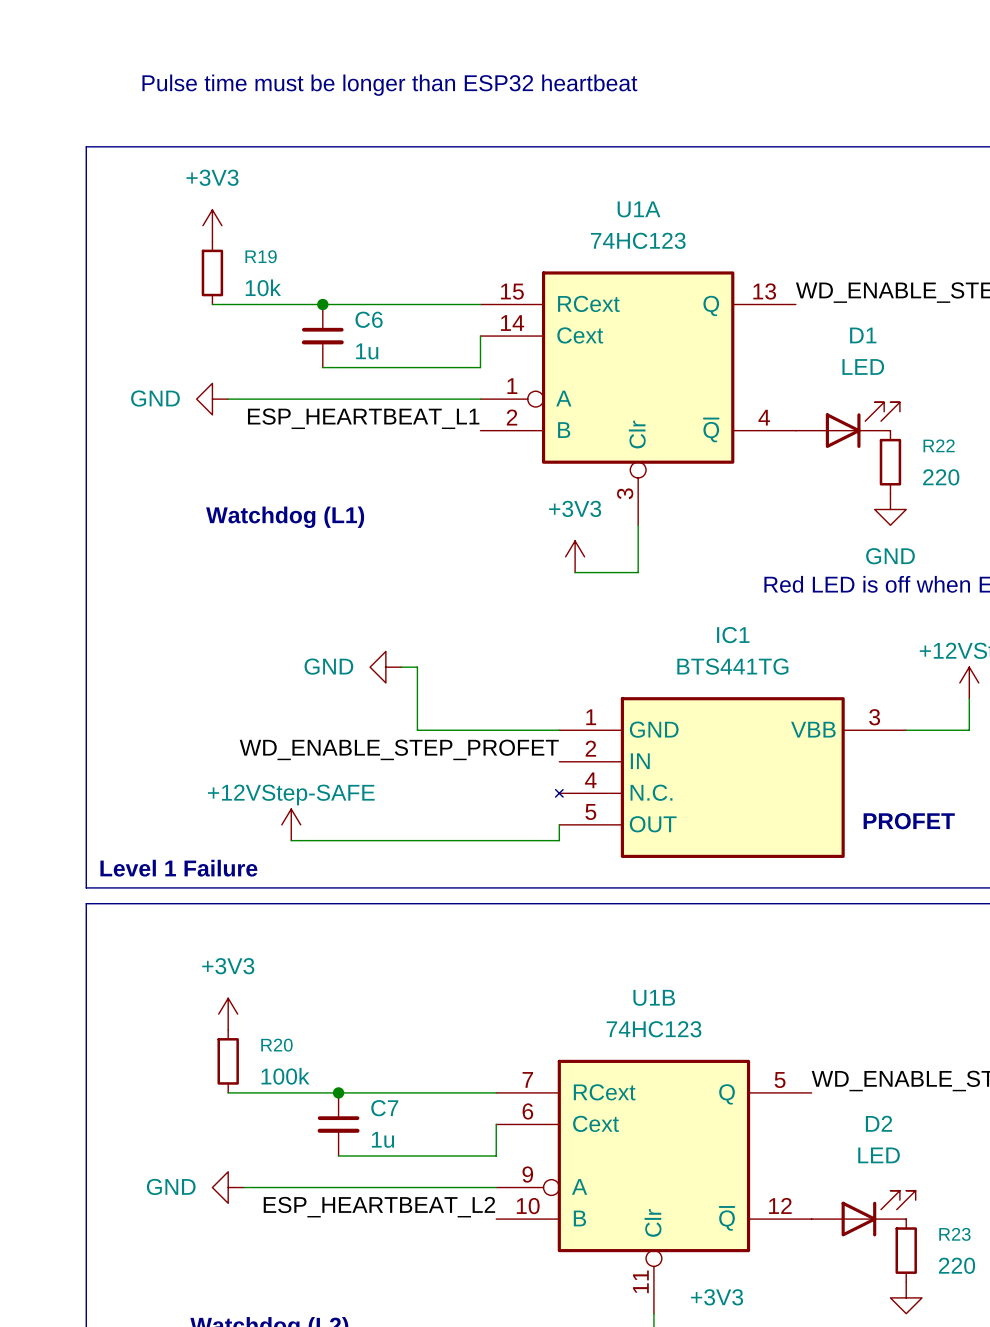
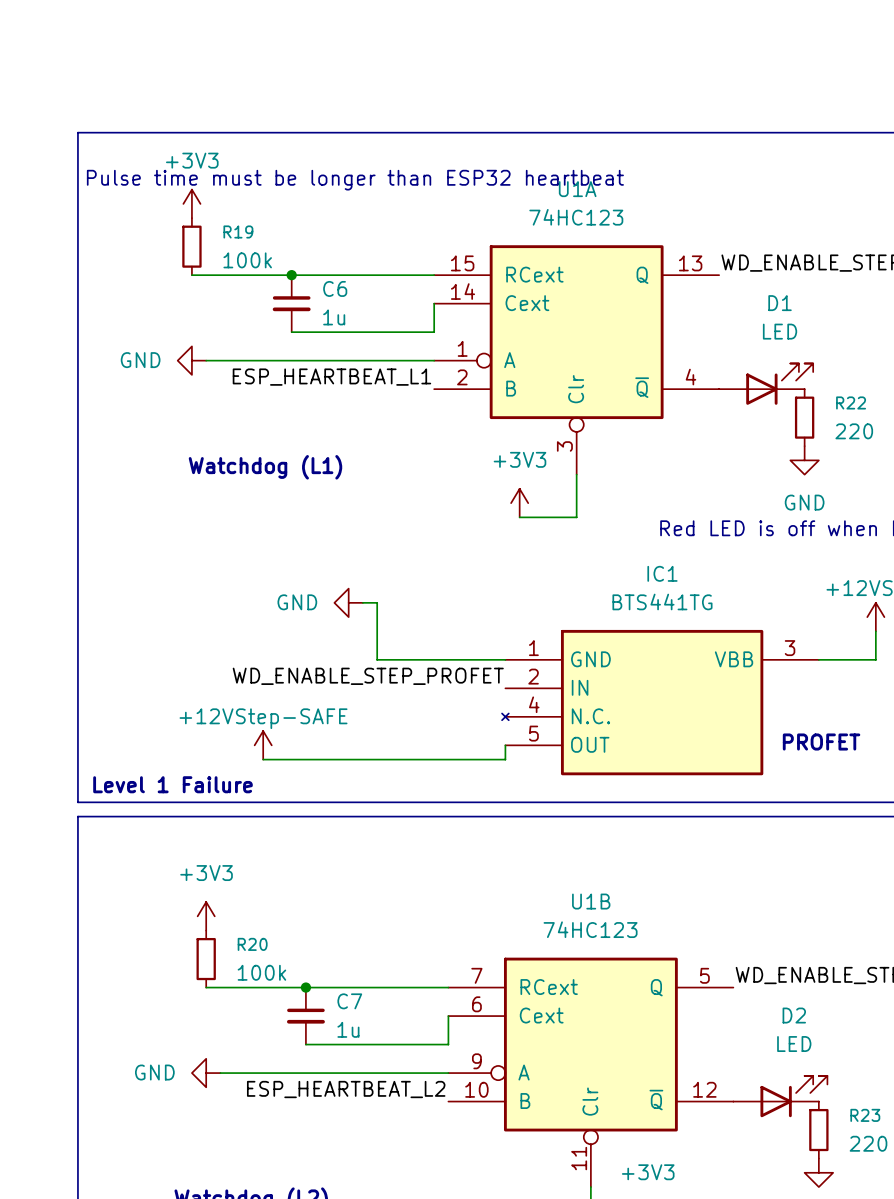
text position: Pulse time must be longer than ESP32 heartbeat (389, 85) -> Pulse time must be longer than ESP32 heartbeat (355, 180)
R19 value: 10k (263, 287) -> 100k (247, 260)

